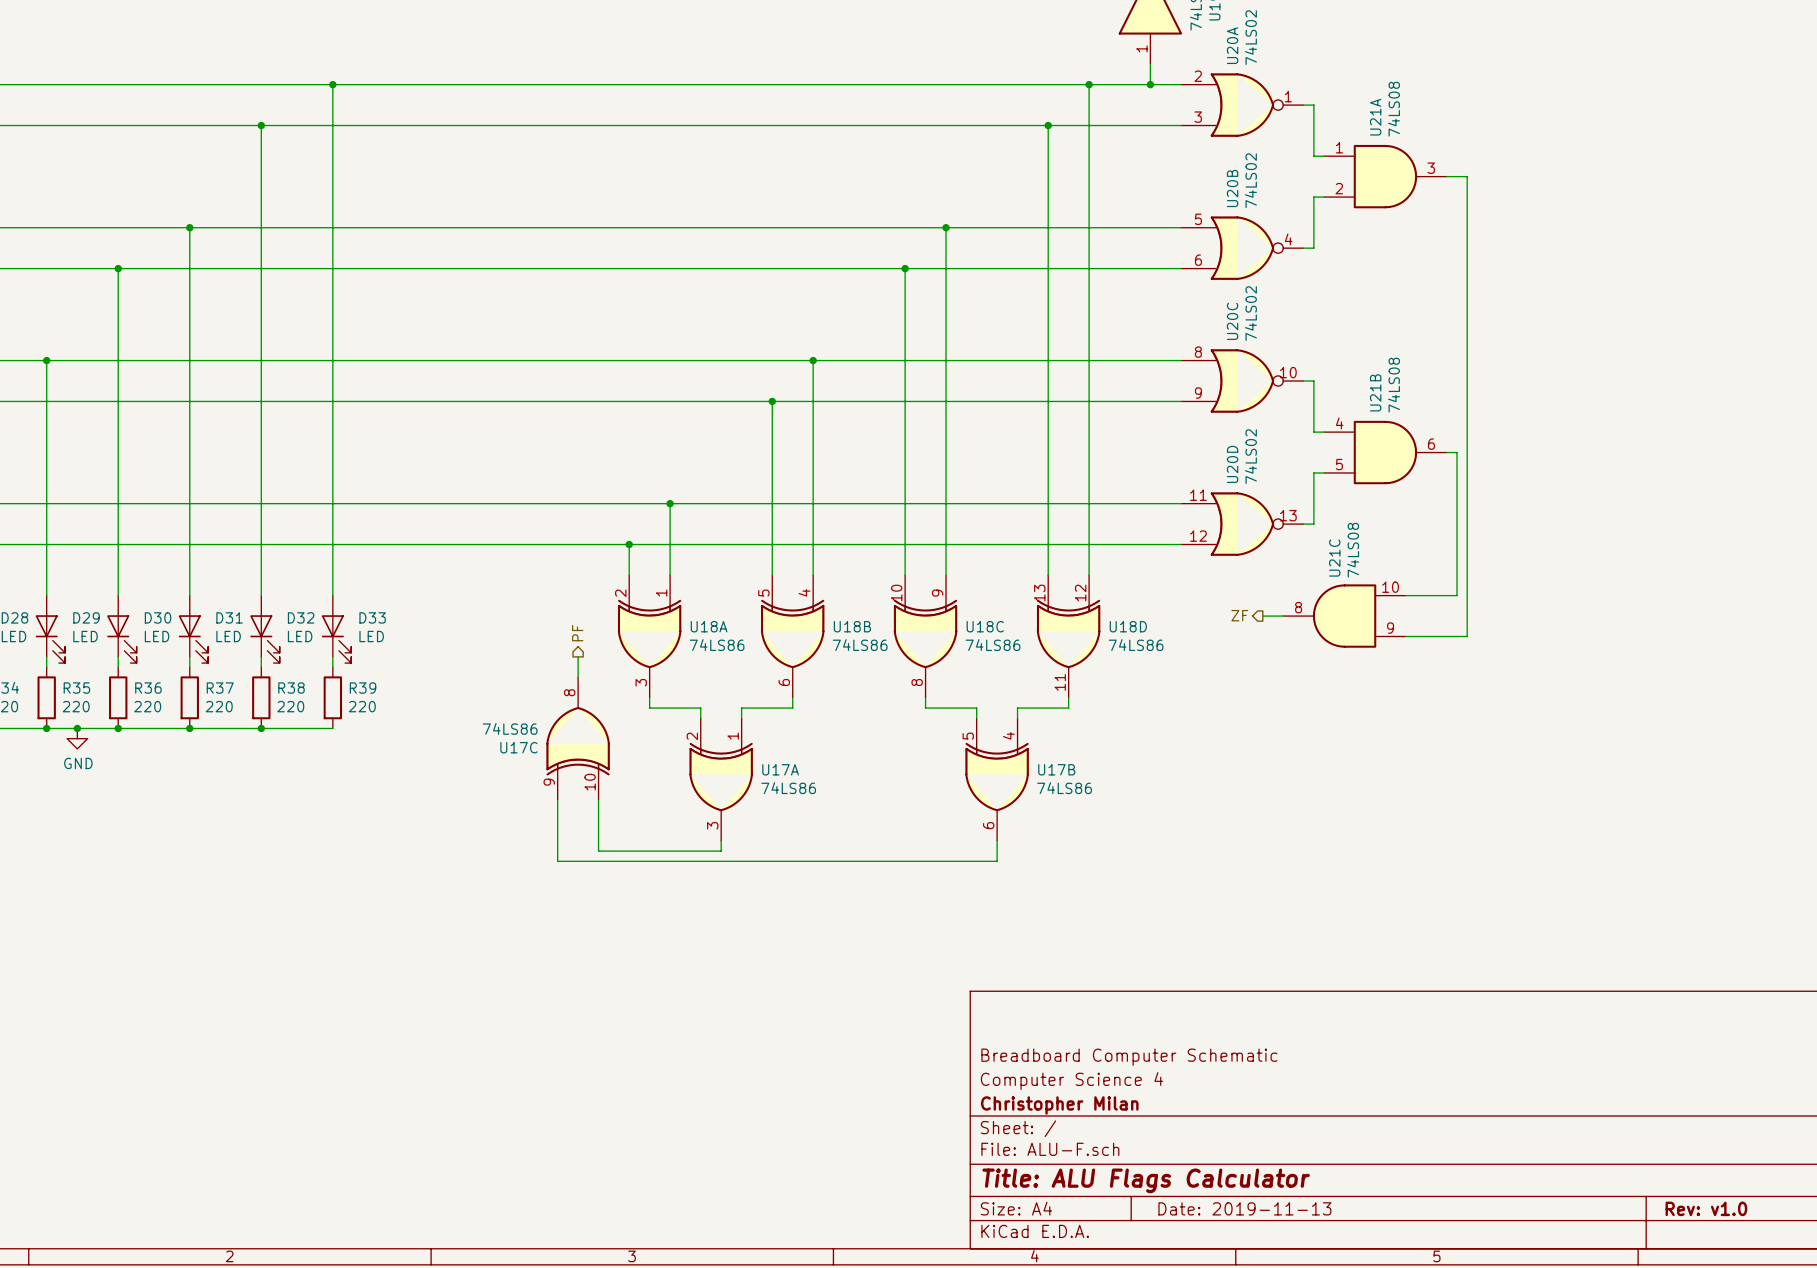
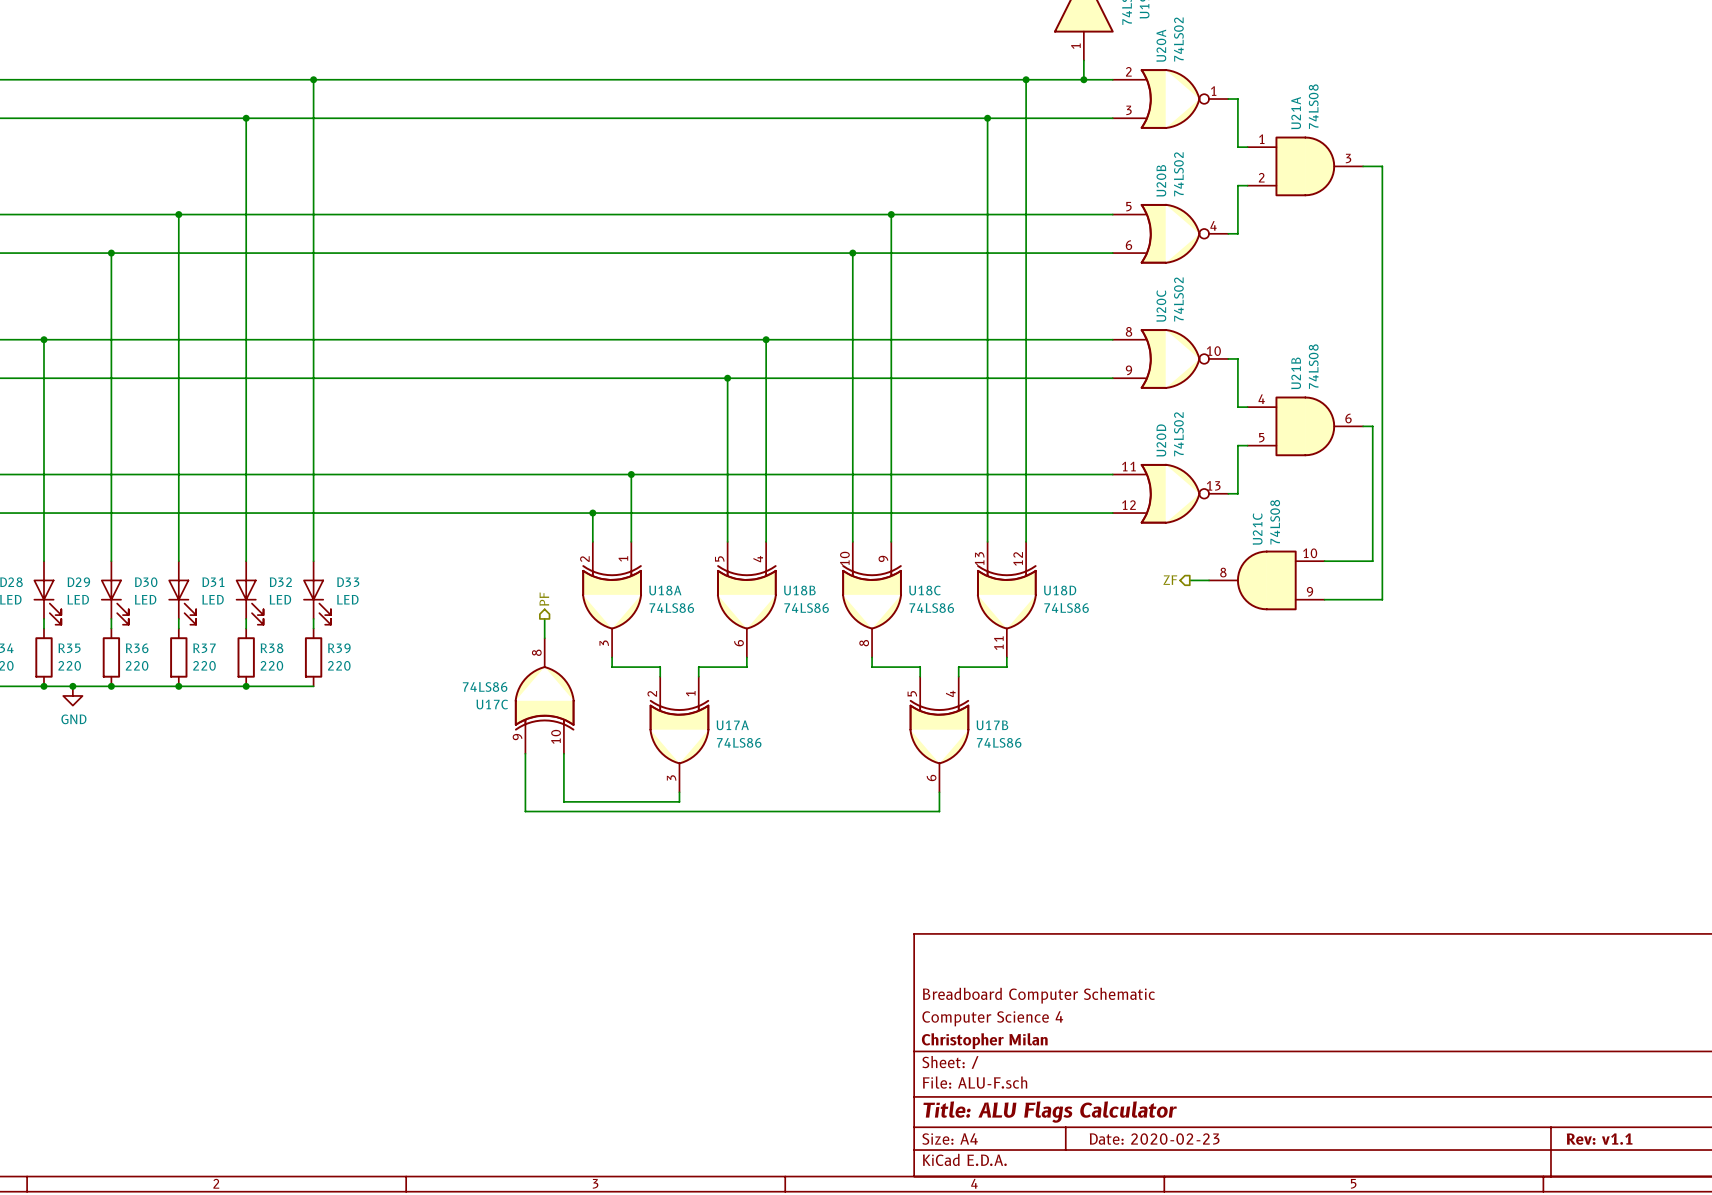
title block: Date: 2019-11-13 (1244, 1208) -> Date: 2020-02-23 (1154, 1139)
title block: Rev: v1.0 (1706, 1208) -> Rev: v1.1 (1599, 1139)

